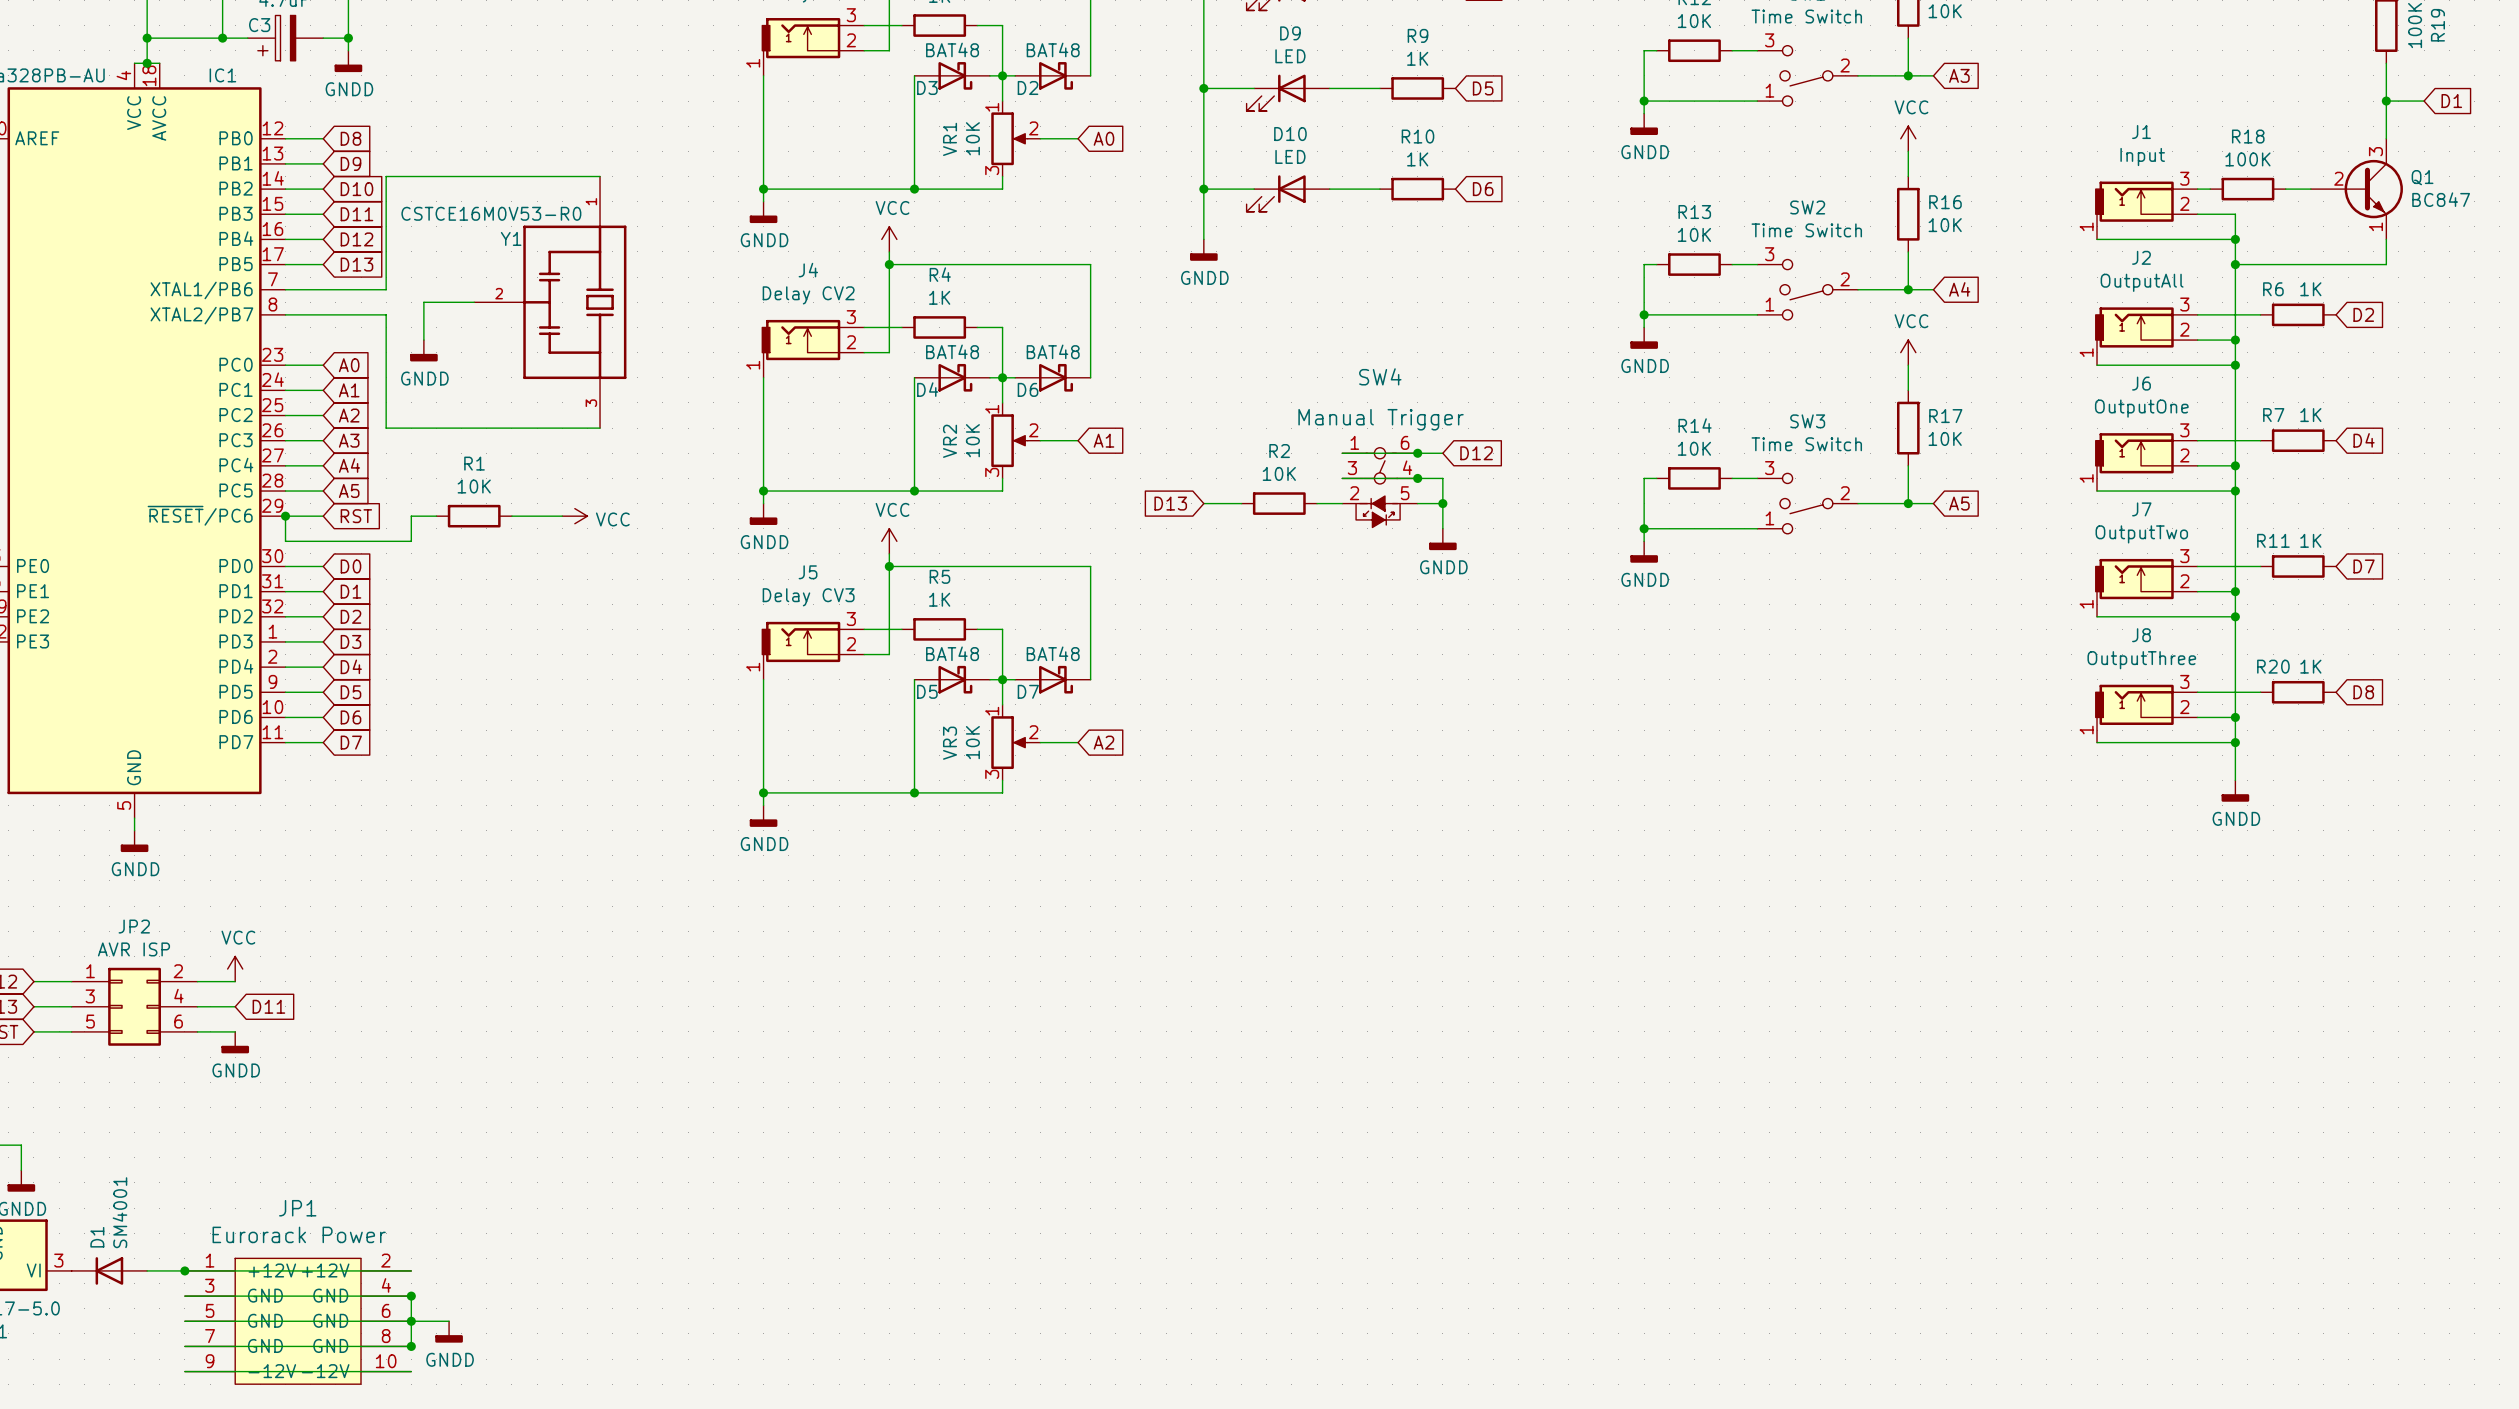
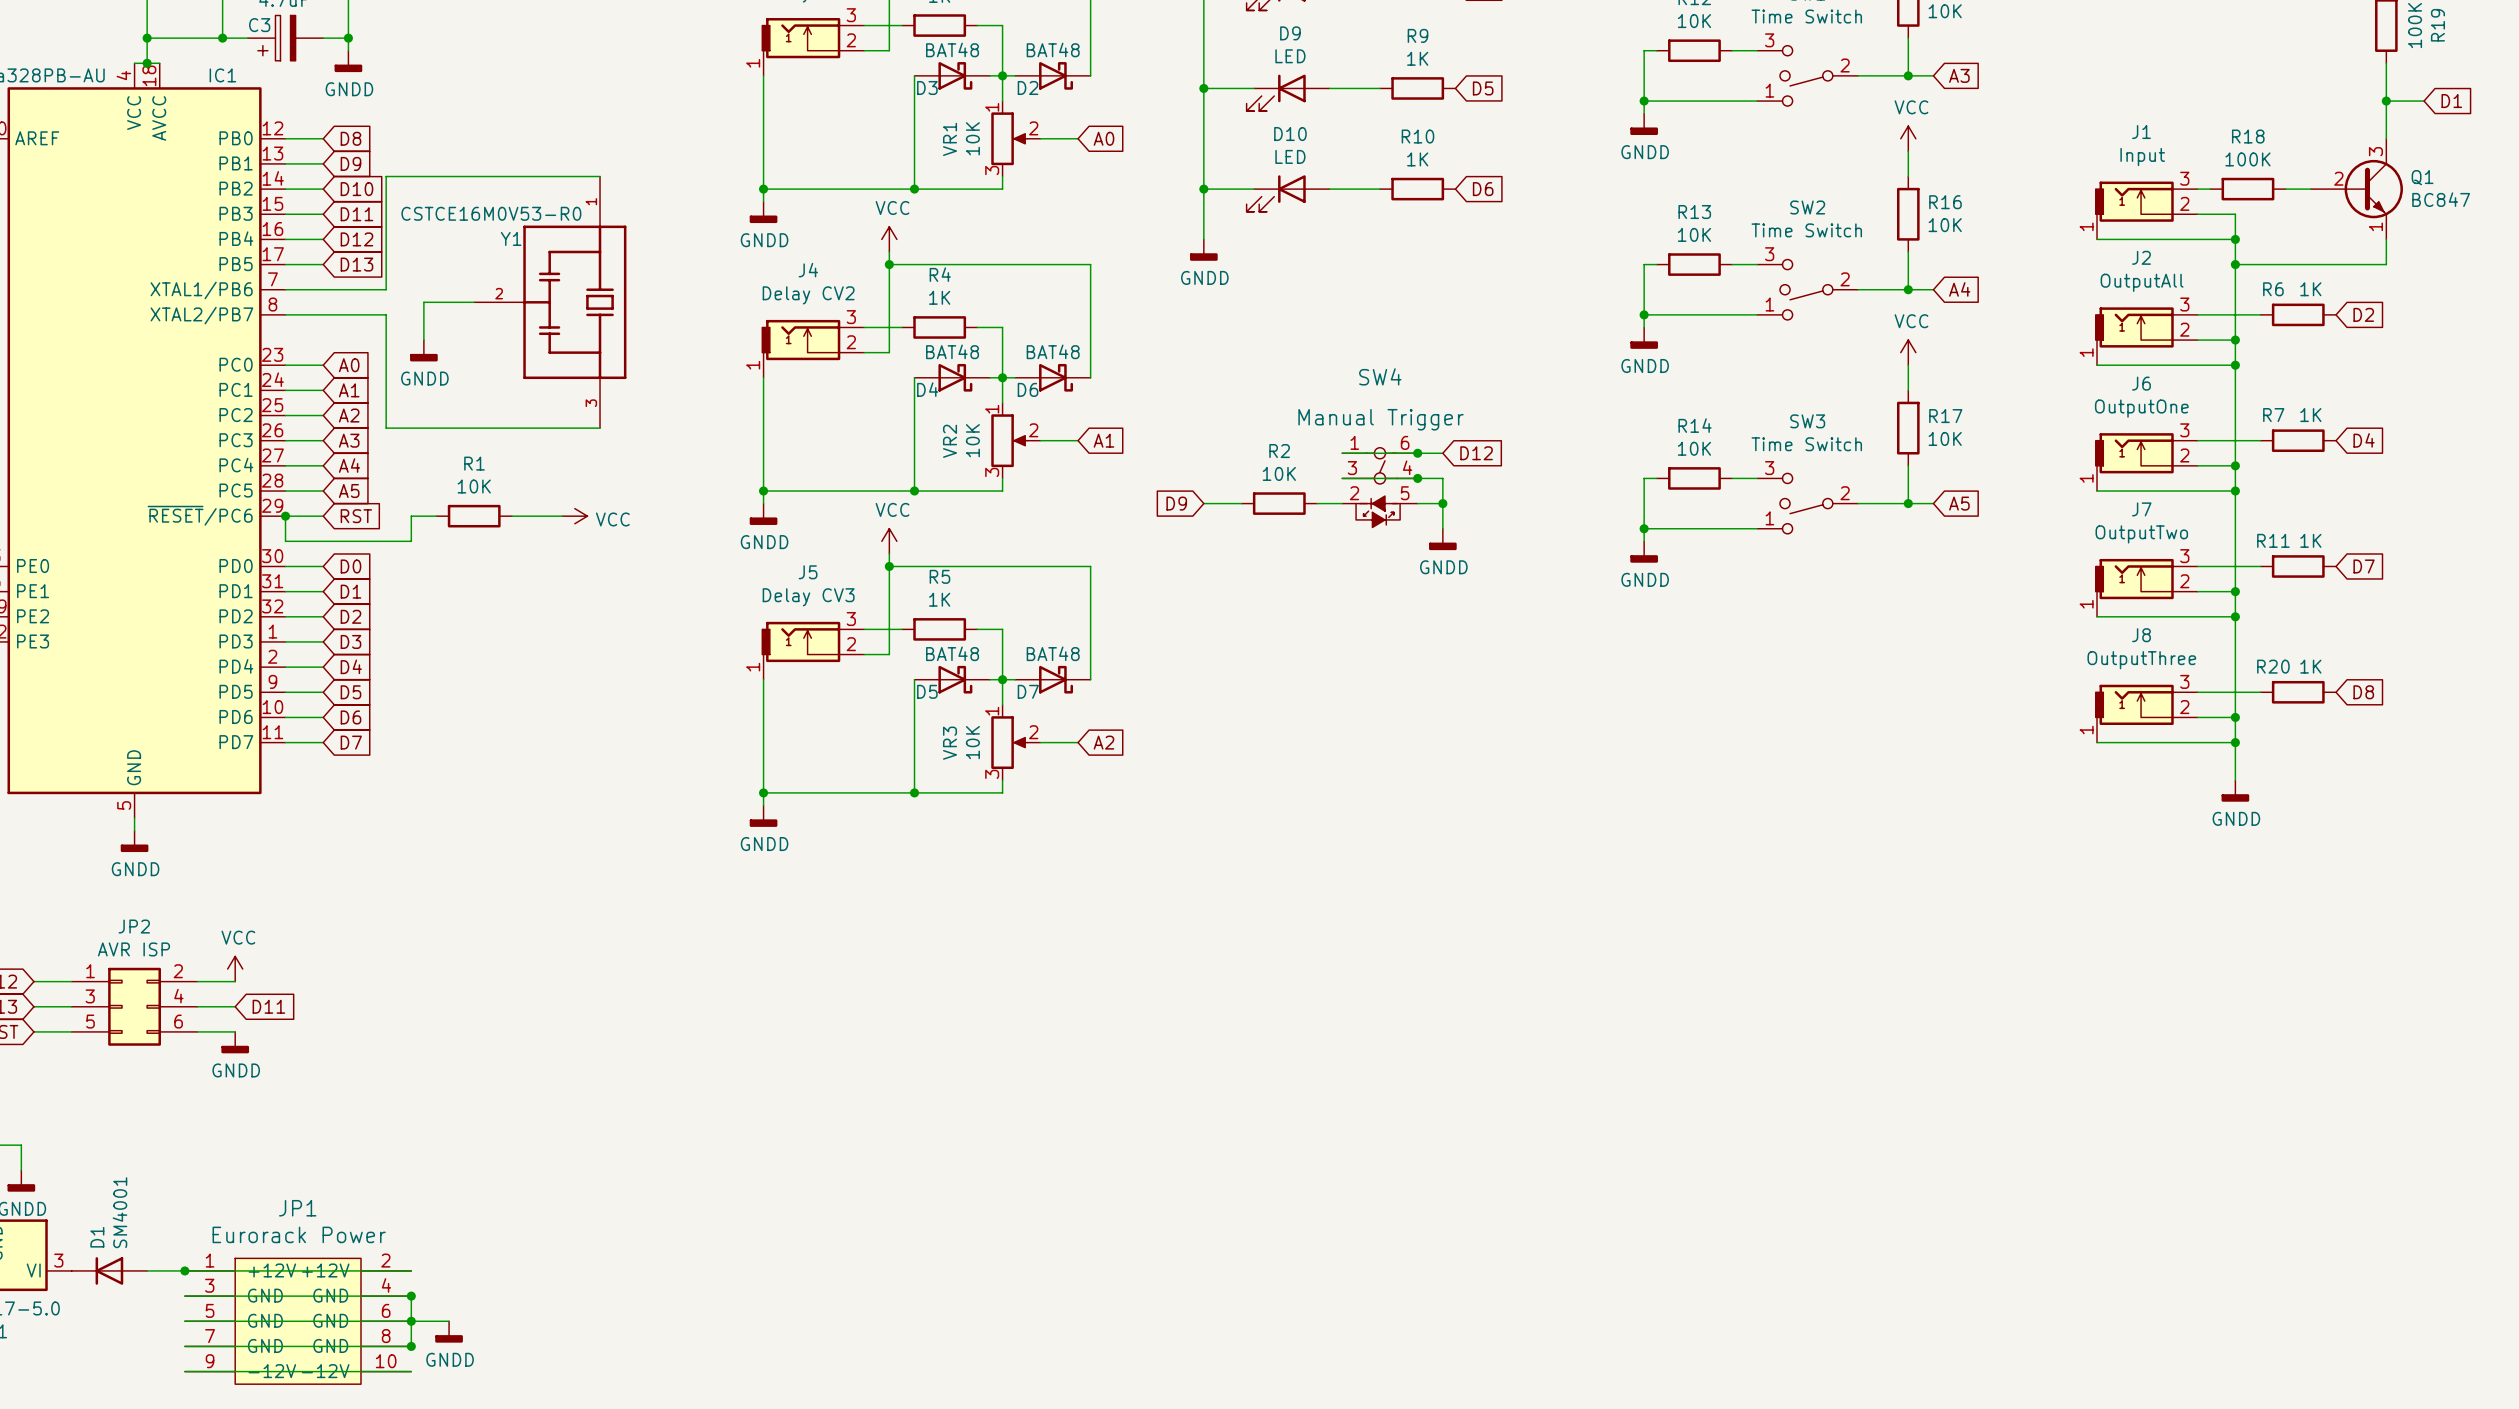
global label: D13 (1170, 503) -> D9 (1176, 503)

